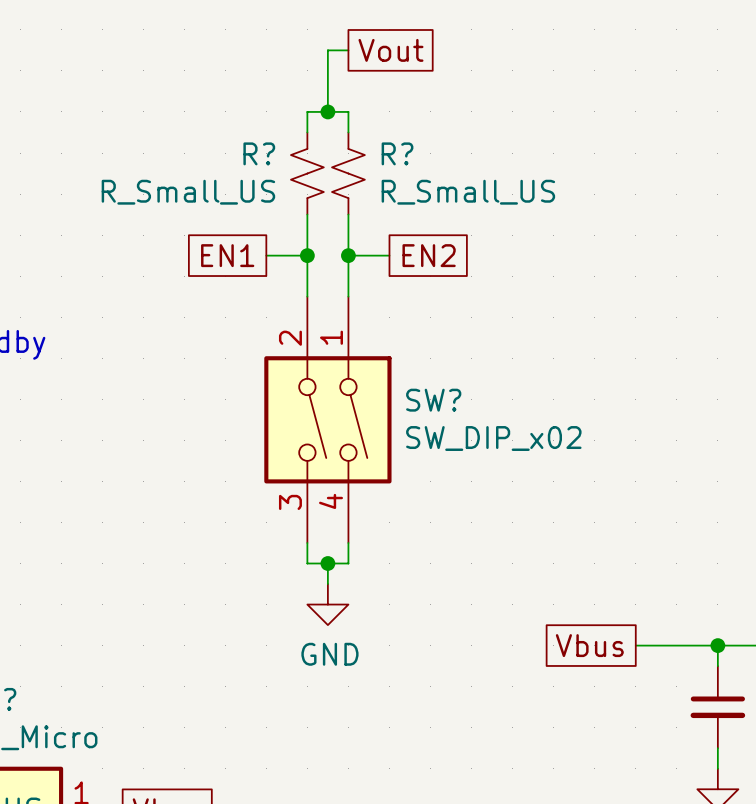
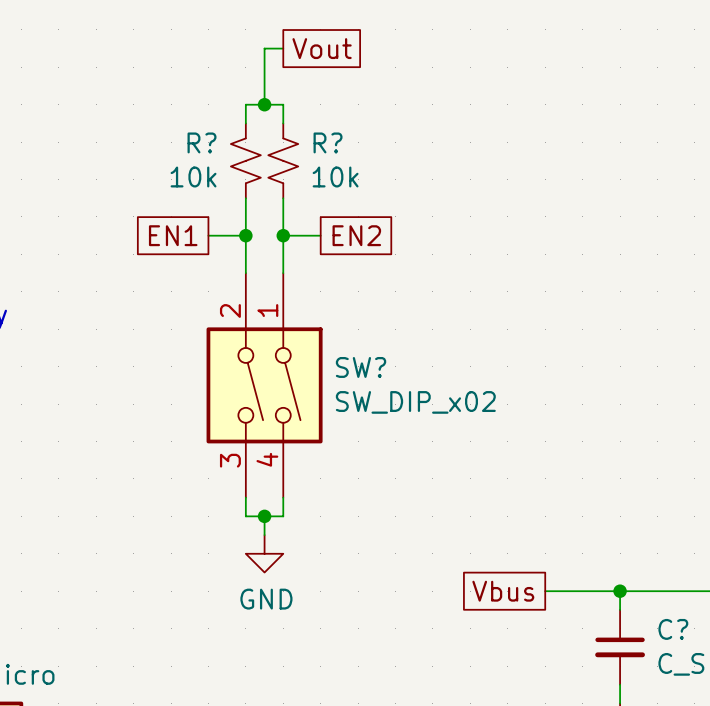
R? value: R_Small_US (188, 192) -> 10k (193, 176)
R? value: R_Small_US (468, 192) -> 10k (335, 176)

